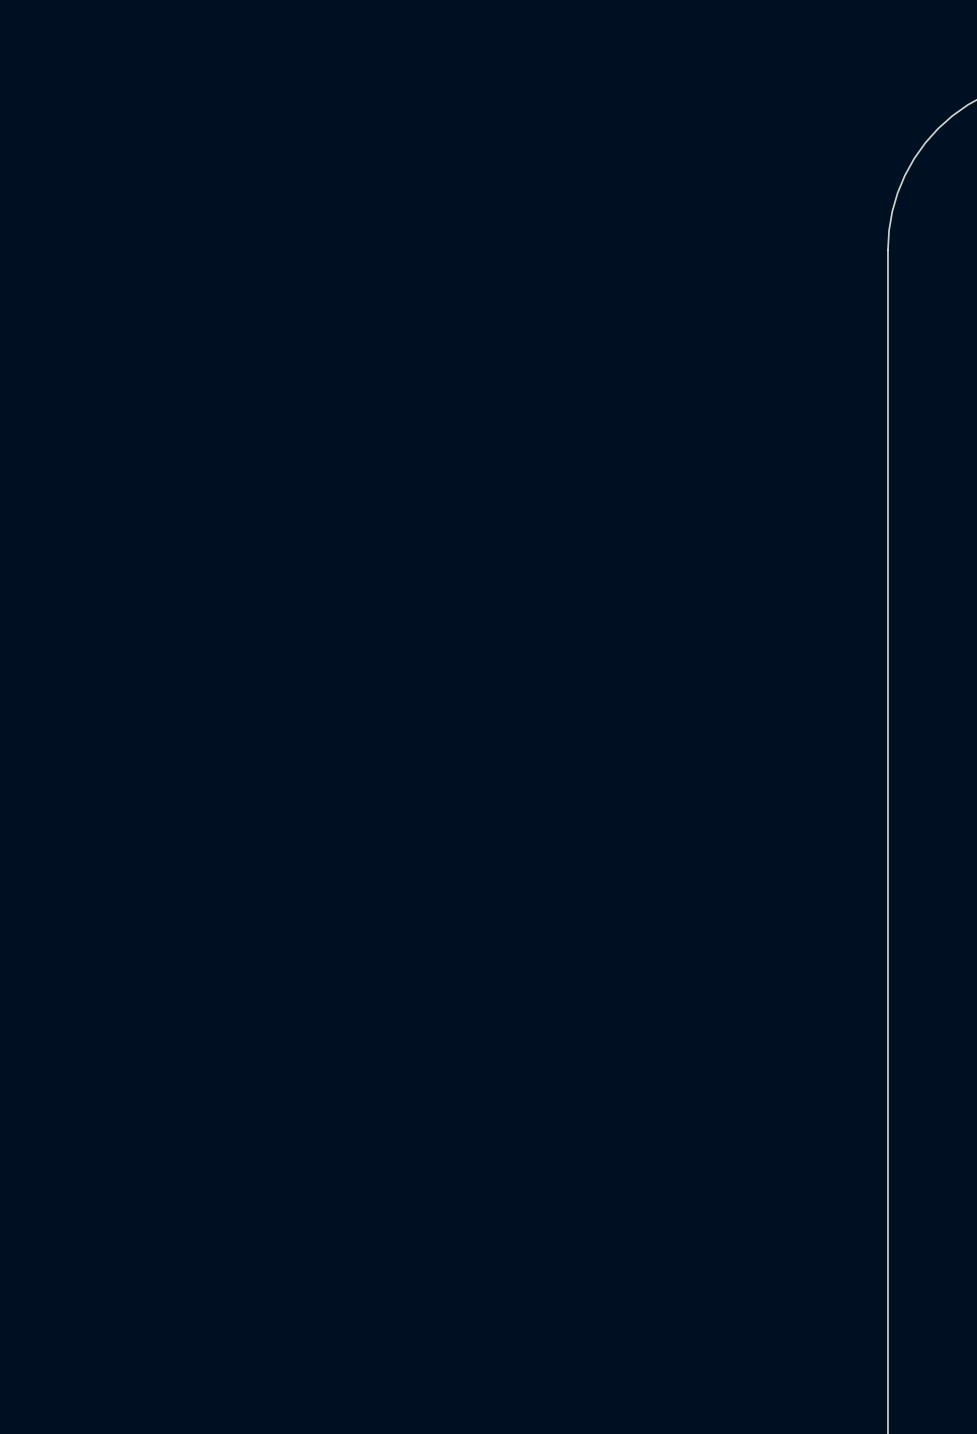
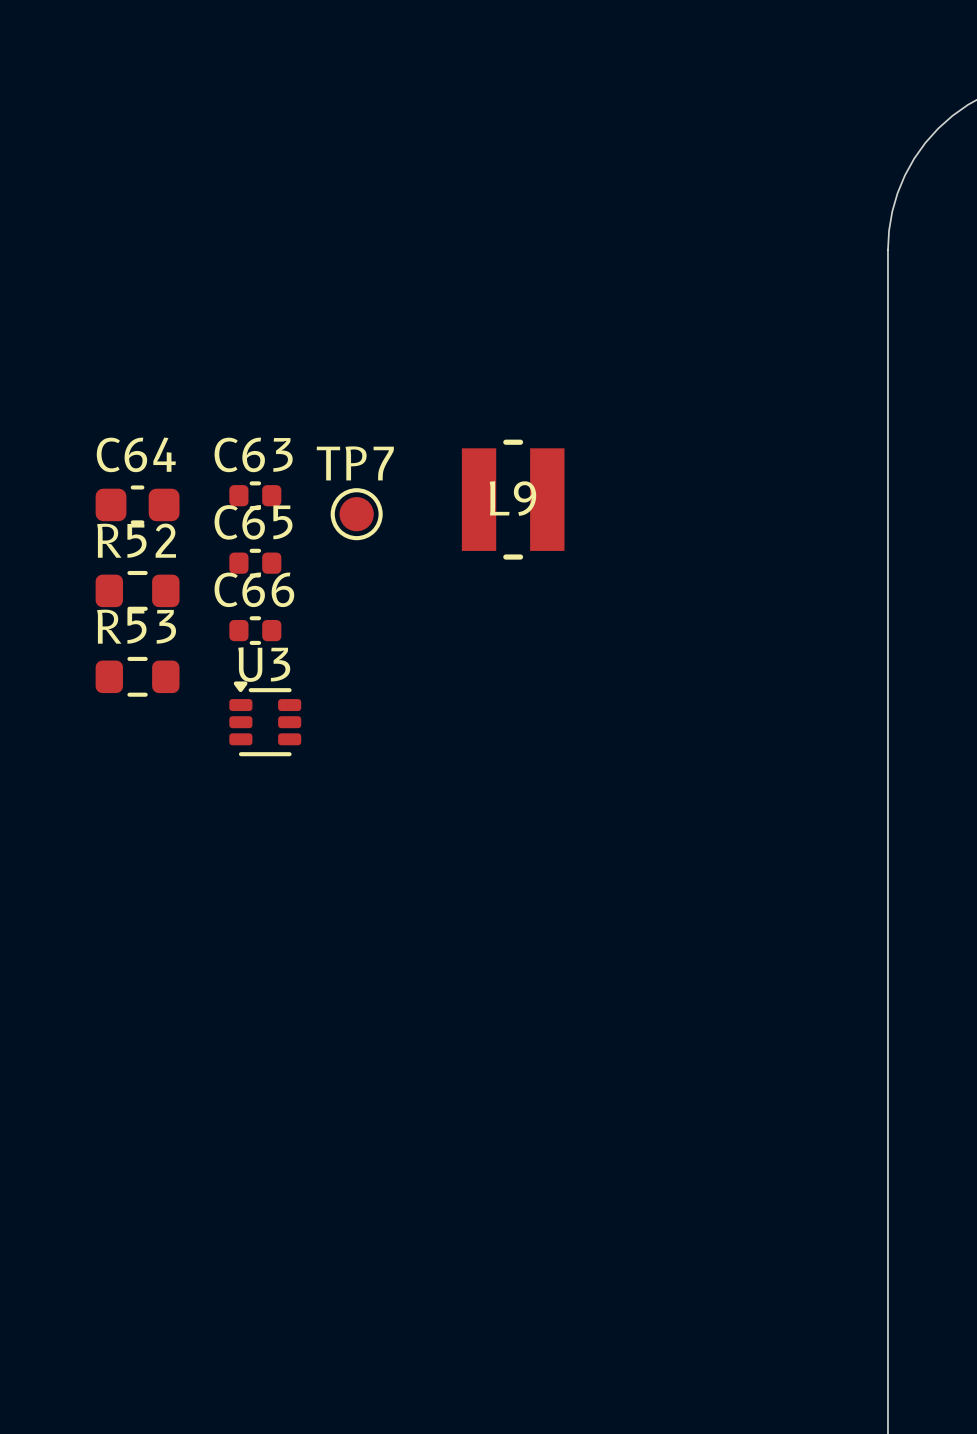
C63: none -> (255, 495)
L9: none -> (513, 499)
C64: none -> (137, 504)
TP7: none -> (356, 514)
C65: none -> (255, 563)
R52: none -> (137, 590)
C66: none -> (255, 630)
R53: none -> (137, 676)
U3: none -> (265, 718)

